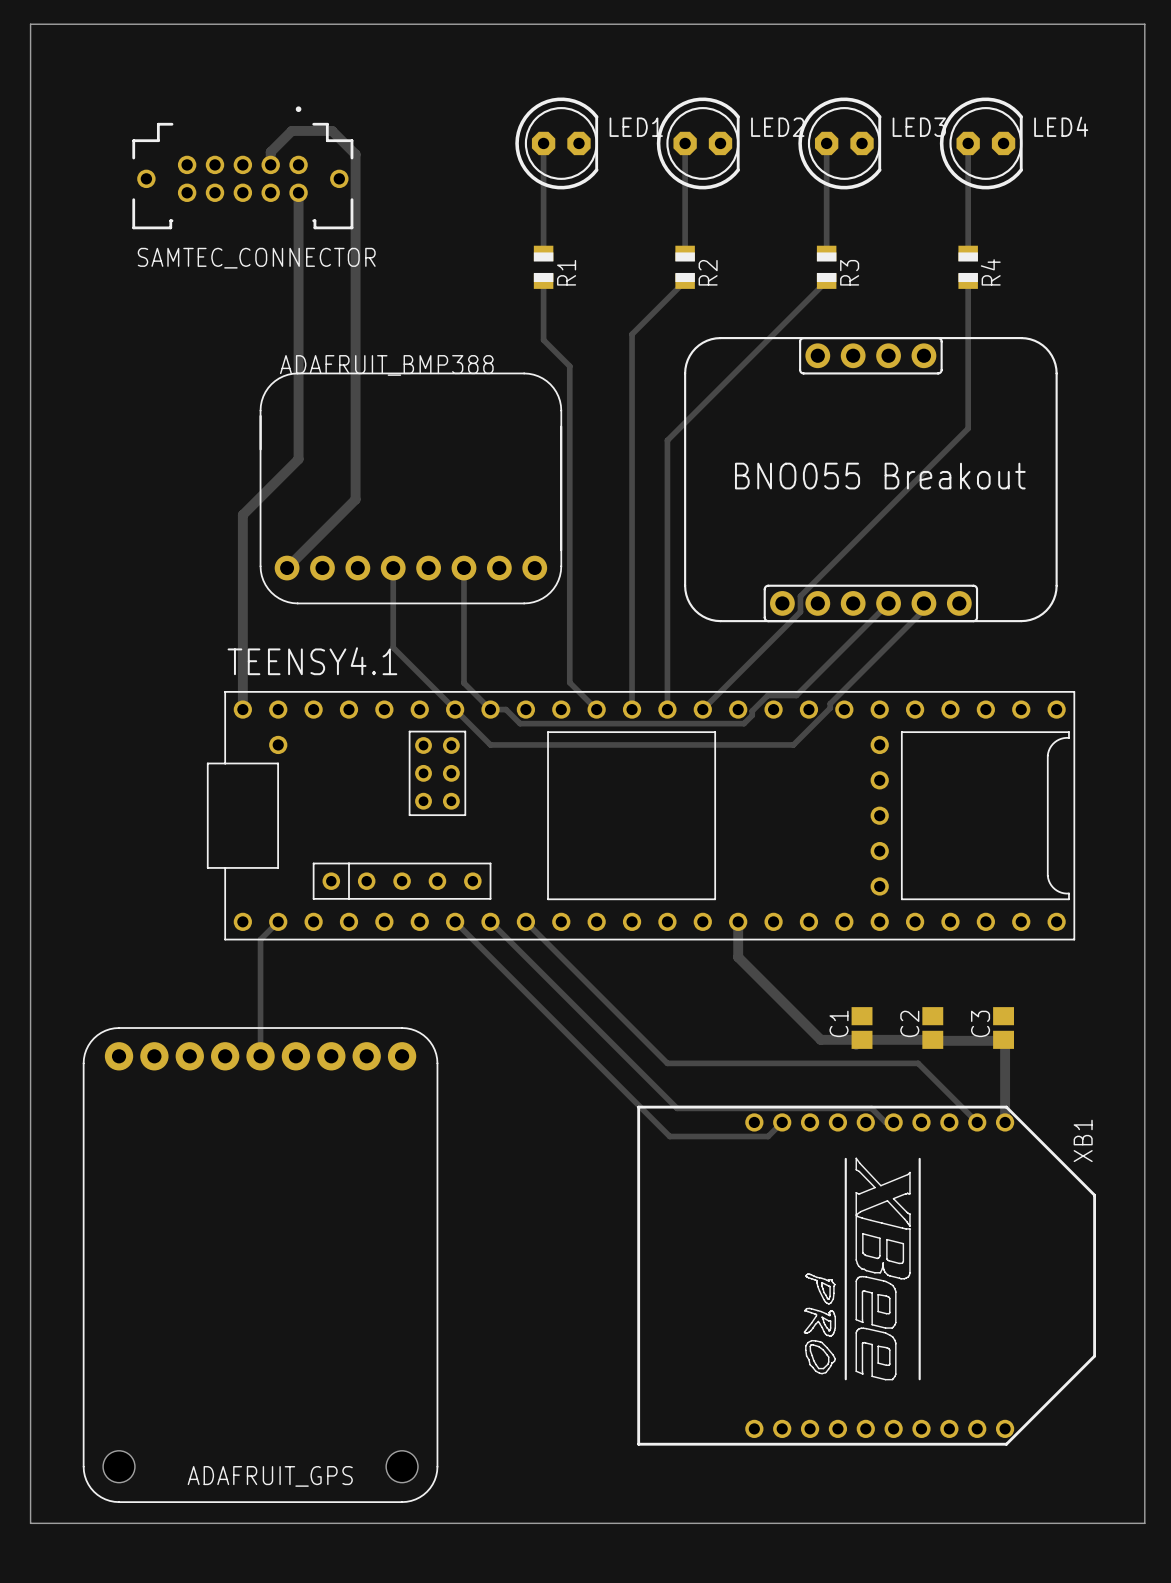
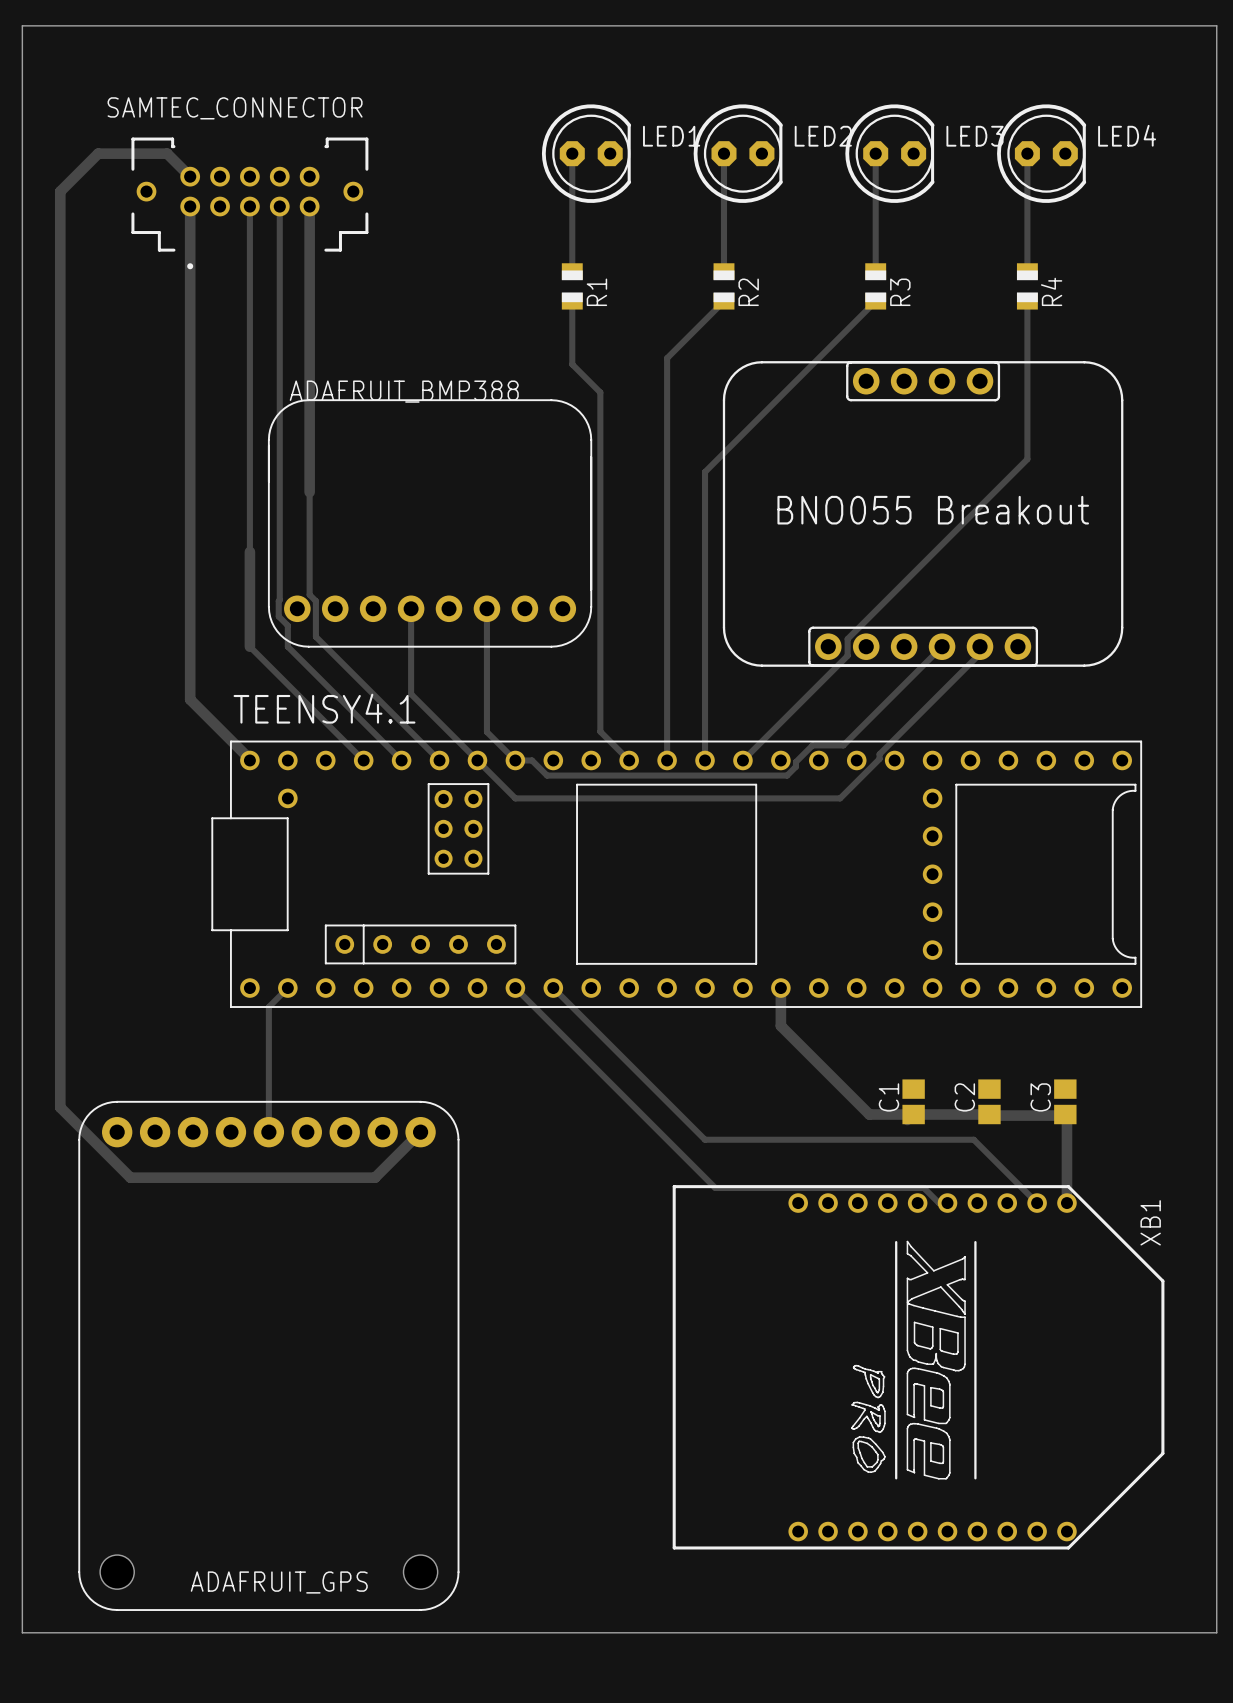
track: none -> (190, 176) (167, 153) (98, 153) (60, 191) (60, 1107) (130, 1177) (375, 1177) (420, 1132)
track: (270, 164) (270, 152) (291, 130) (332, 130) (355, 154) (355, 499) (287, 568) -> none
SAMTEC_CONNECTOR rotation: 0° (242, 167) -> 180° (249, 203)
track: none -> (190, 206) (190, 699) (249, 759)
track: none -> (249, 206) (249, 551)
track: none -> (279, 206) (278, 616) (287, 625) (287, 646) (401, 760)
track: (298, 459) (242, 514) -> (309, 492) (309, 594) (315, 601) (315, 636) (439, 760)
track: (242, 603) (242, 708) -> (249, 646) (363, 760)
track: (455, 921) (669, 1136) (768, 1136) (782, 1122) -> none

